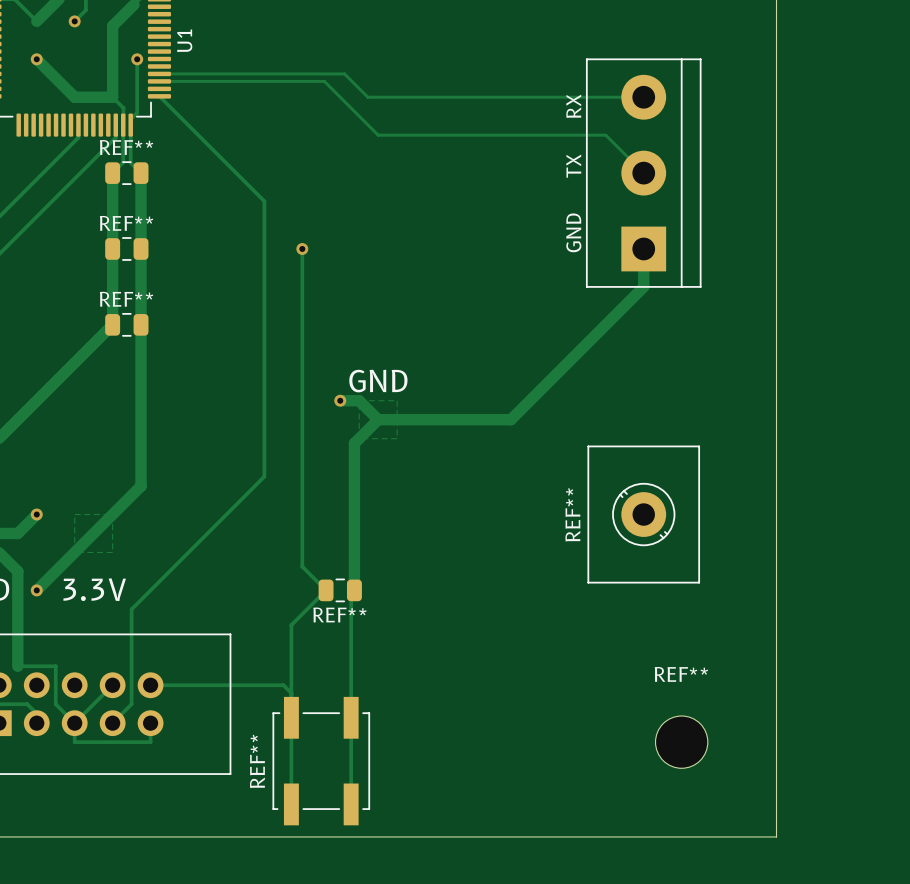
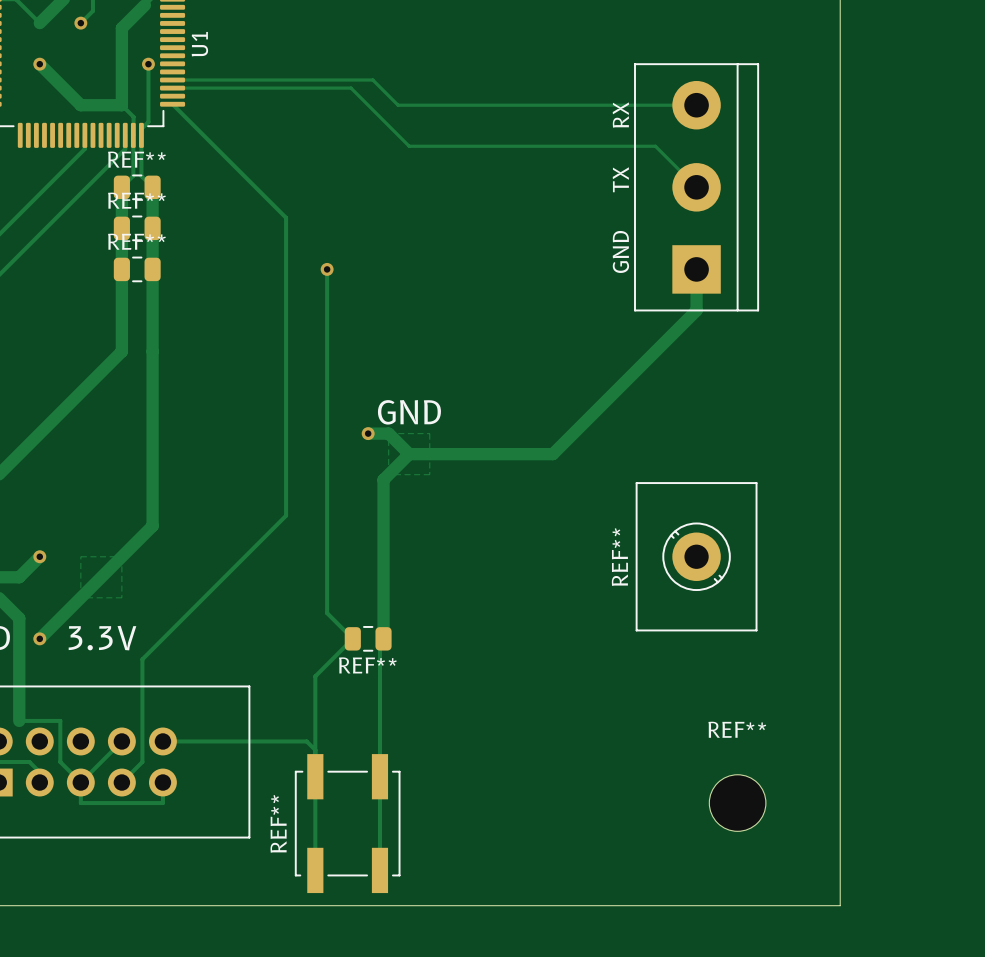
REF** position: (126, 324) -> (137, 228)

